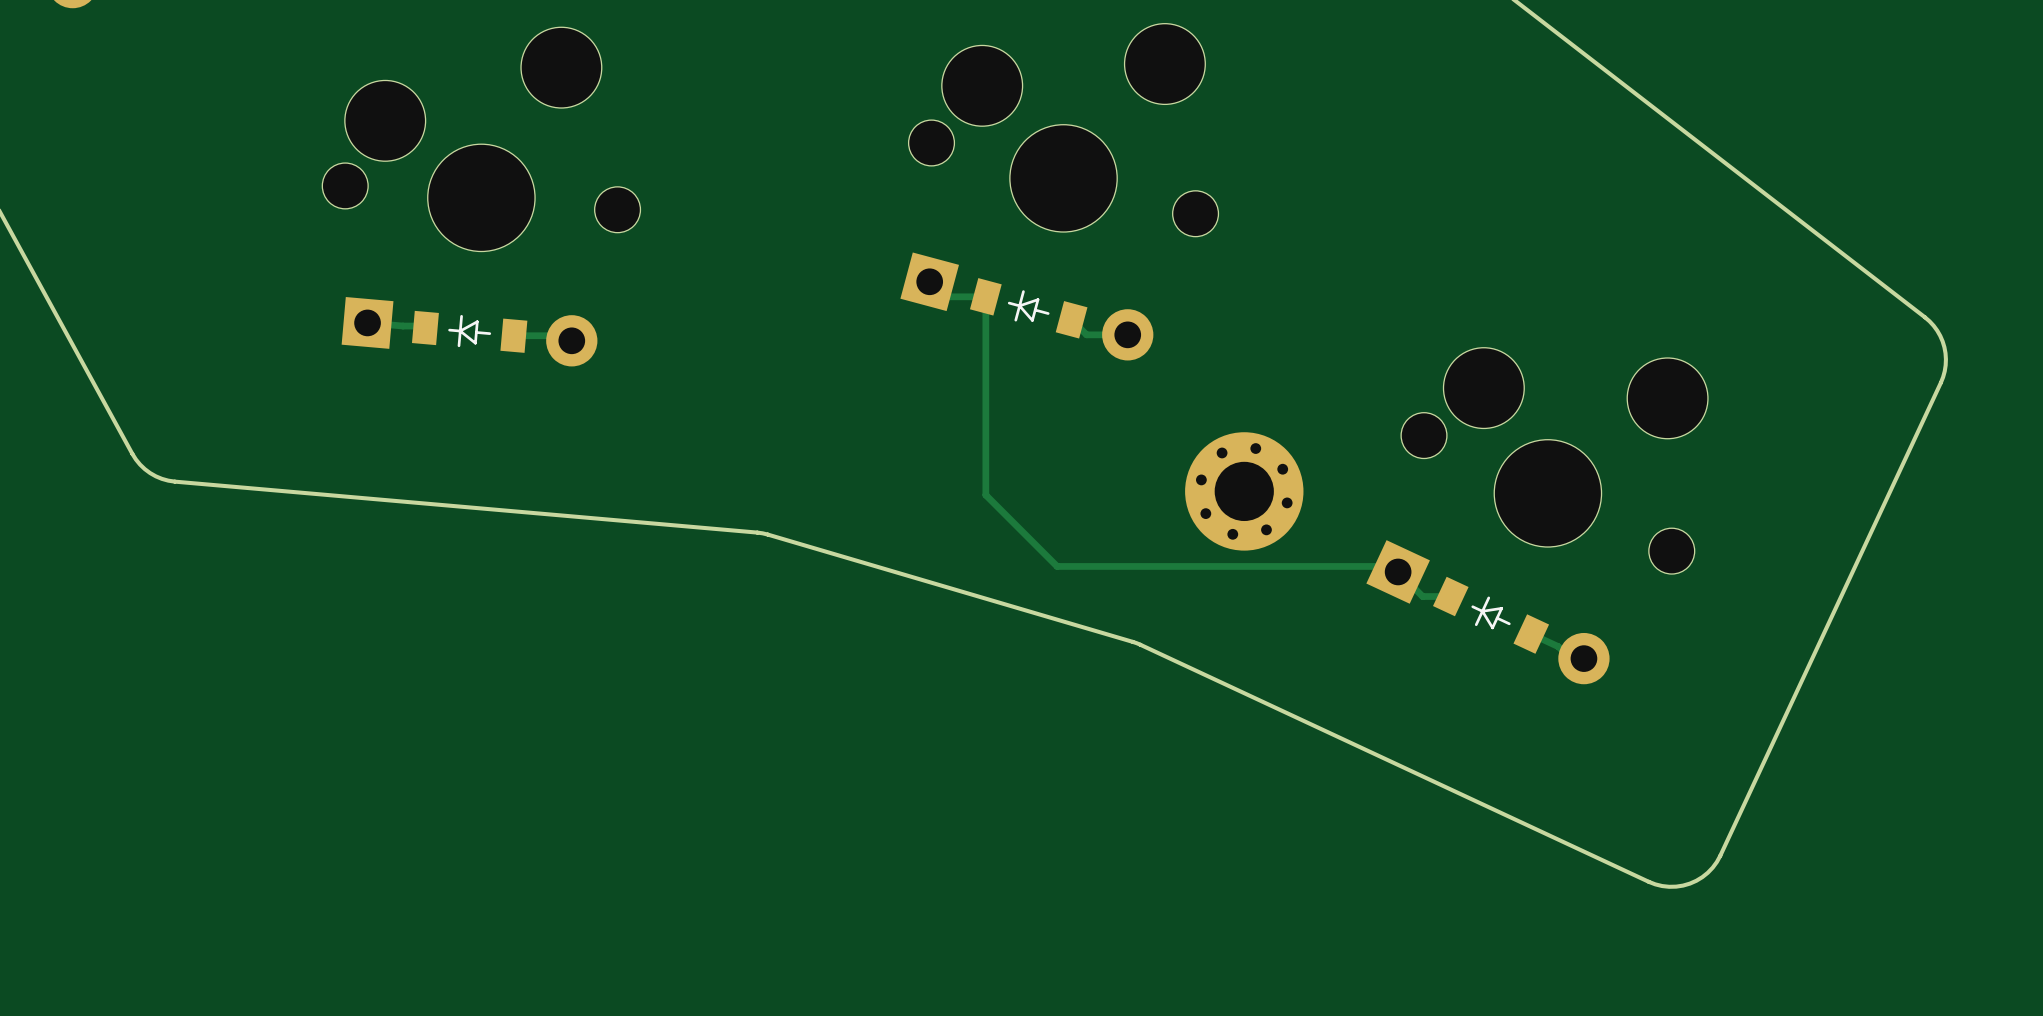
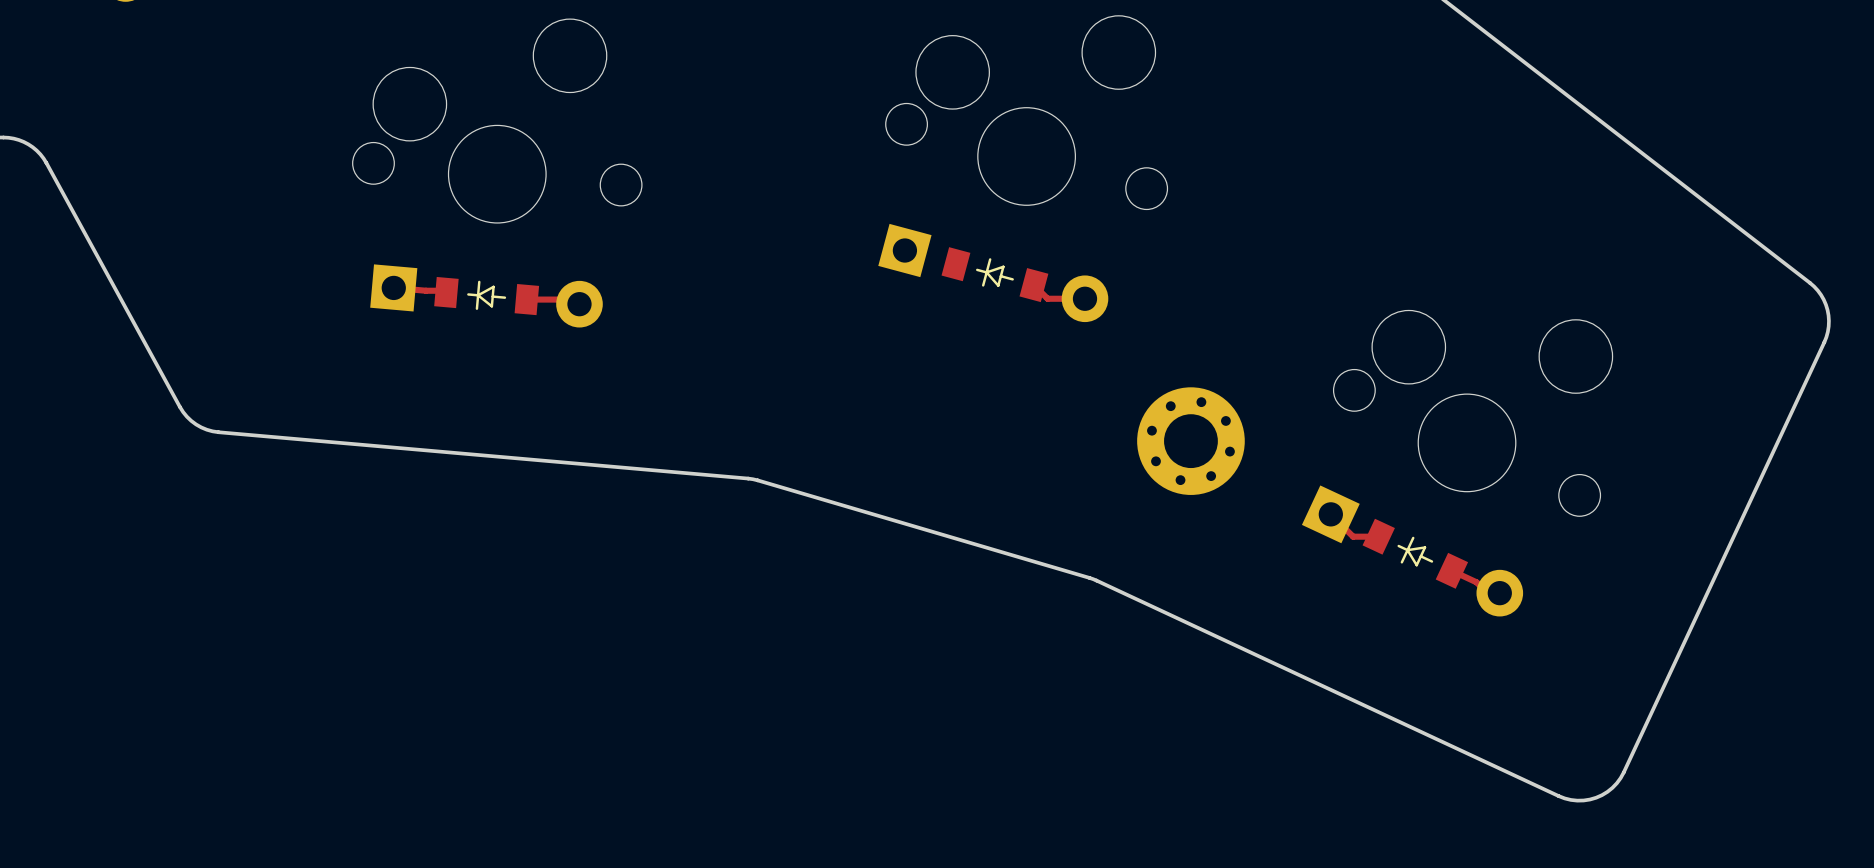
track: (929, 281) (944, 296) (985, 296) (985, 495) (1057, 566) (1392, 566) -> none

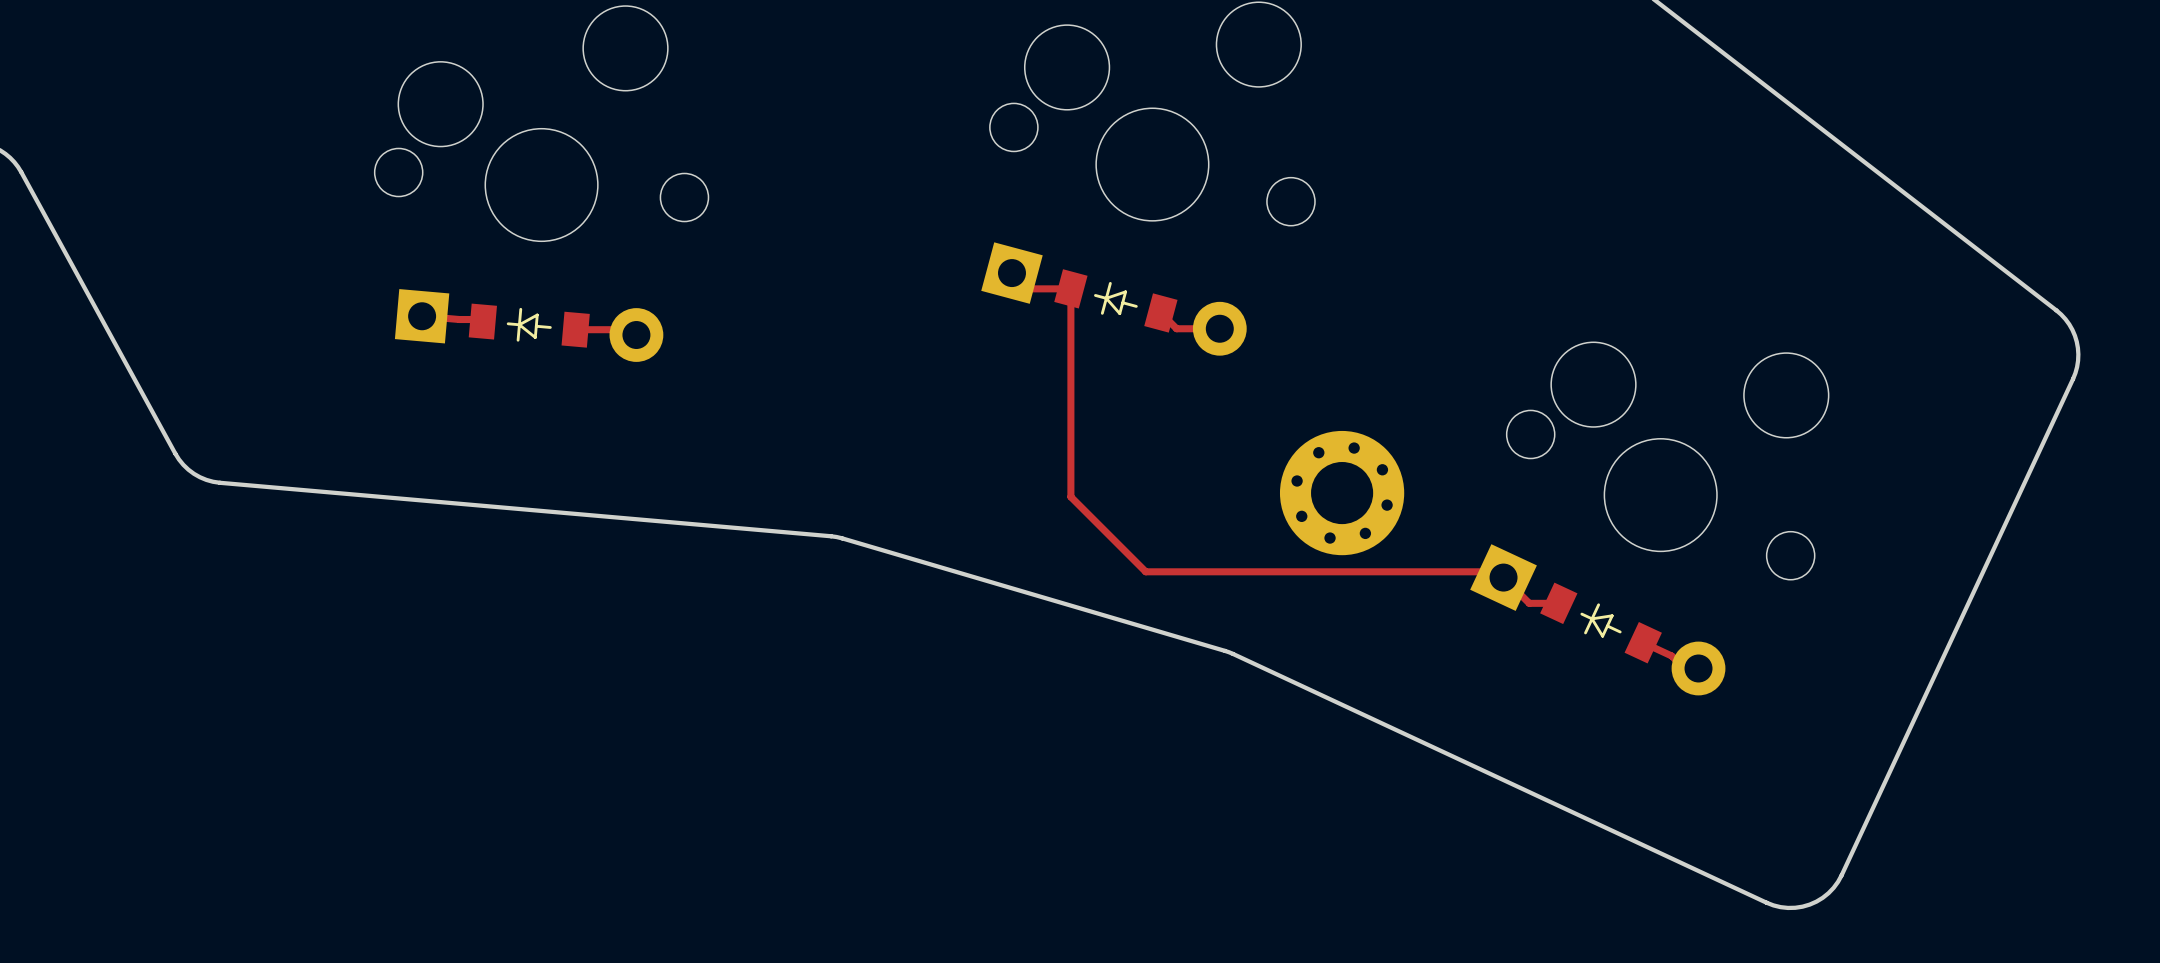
track: none -> (1011, 273) (1027, 288) (1070, 288) (1070, 496) (1145, 571) (1497, 571)

